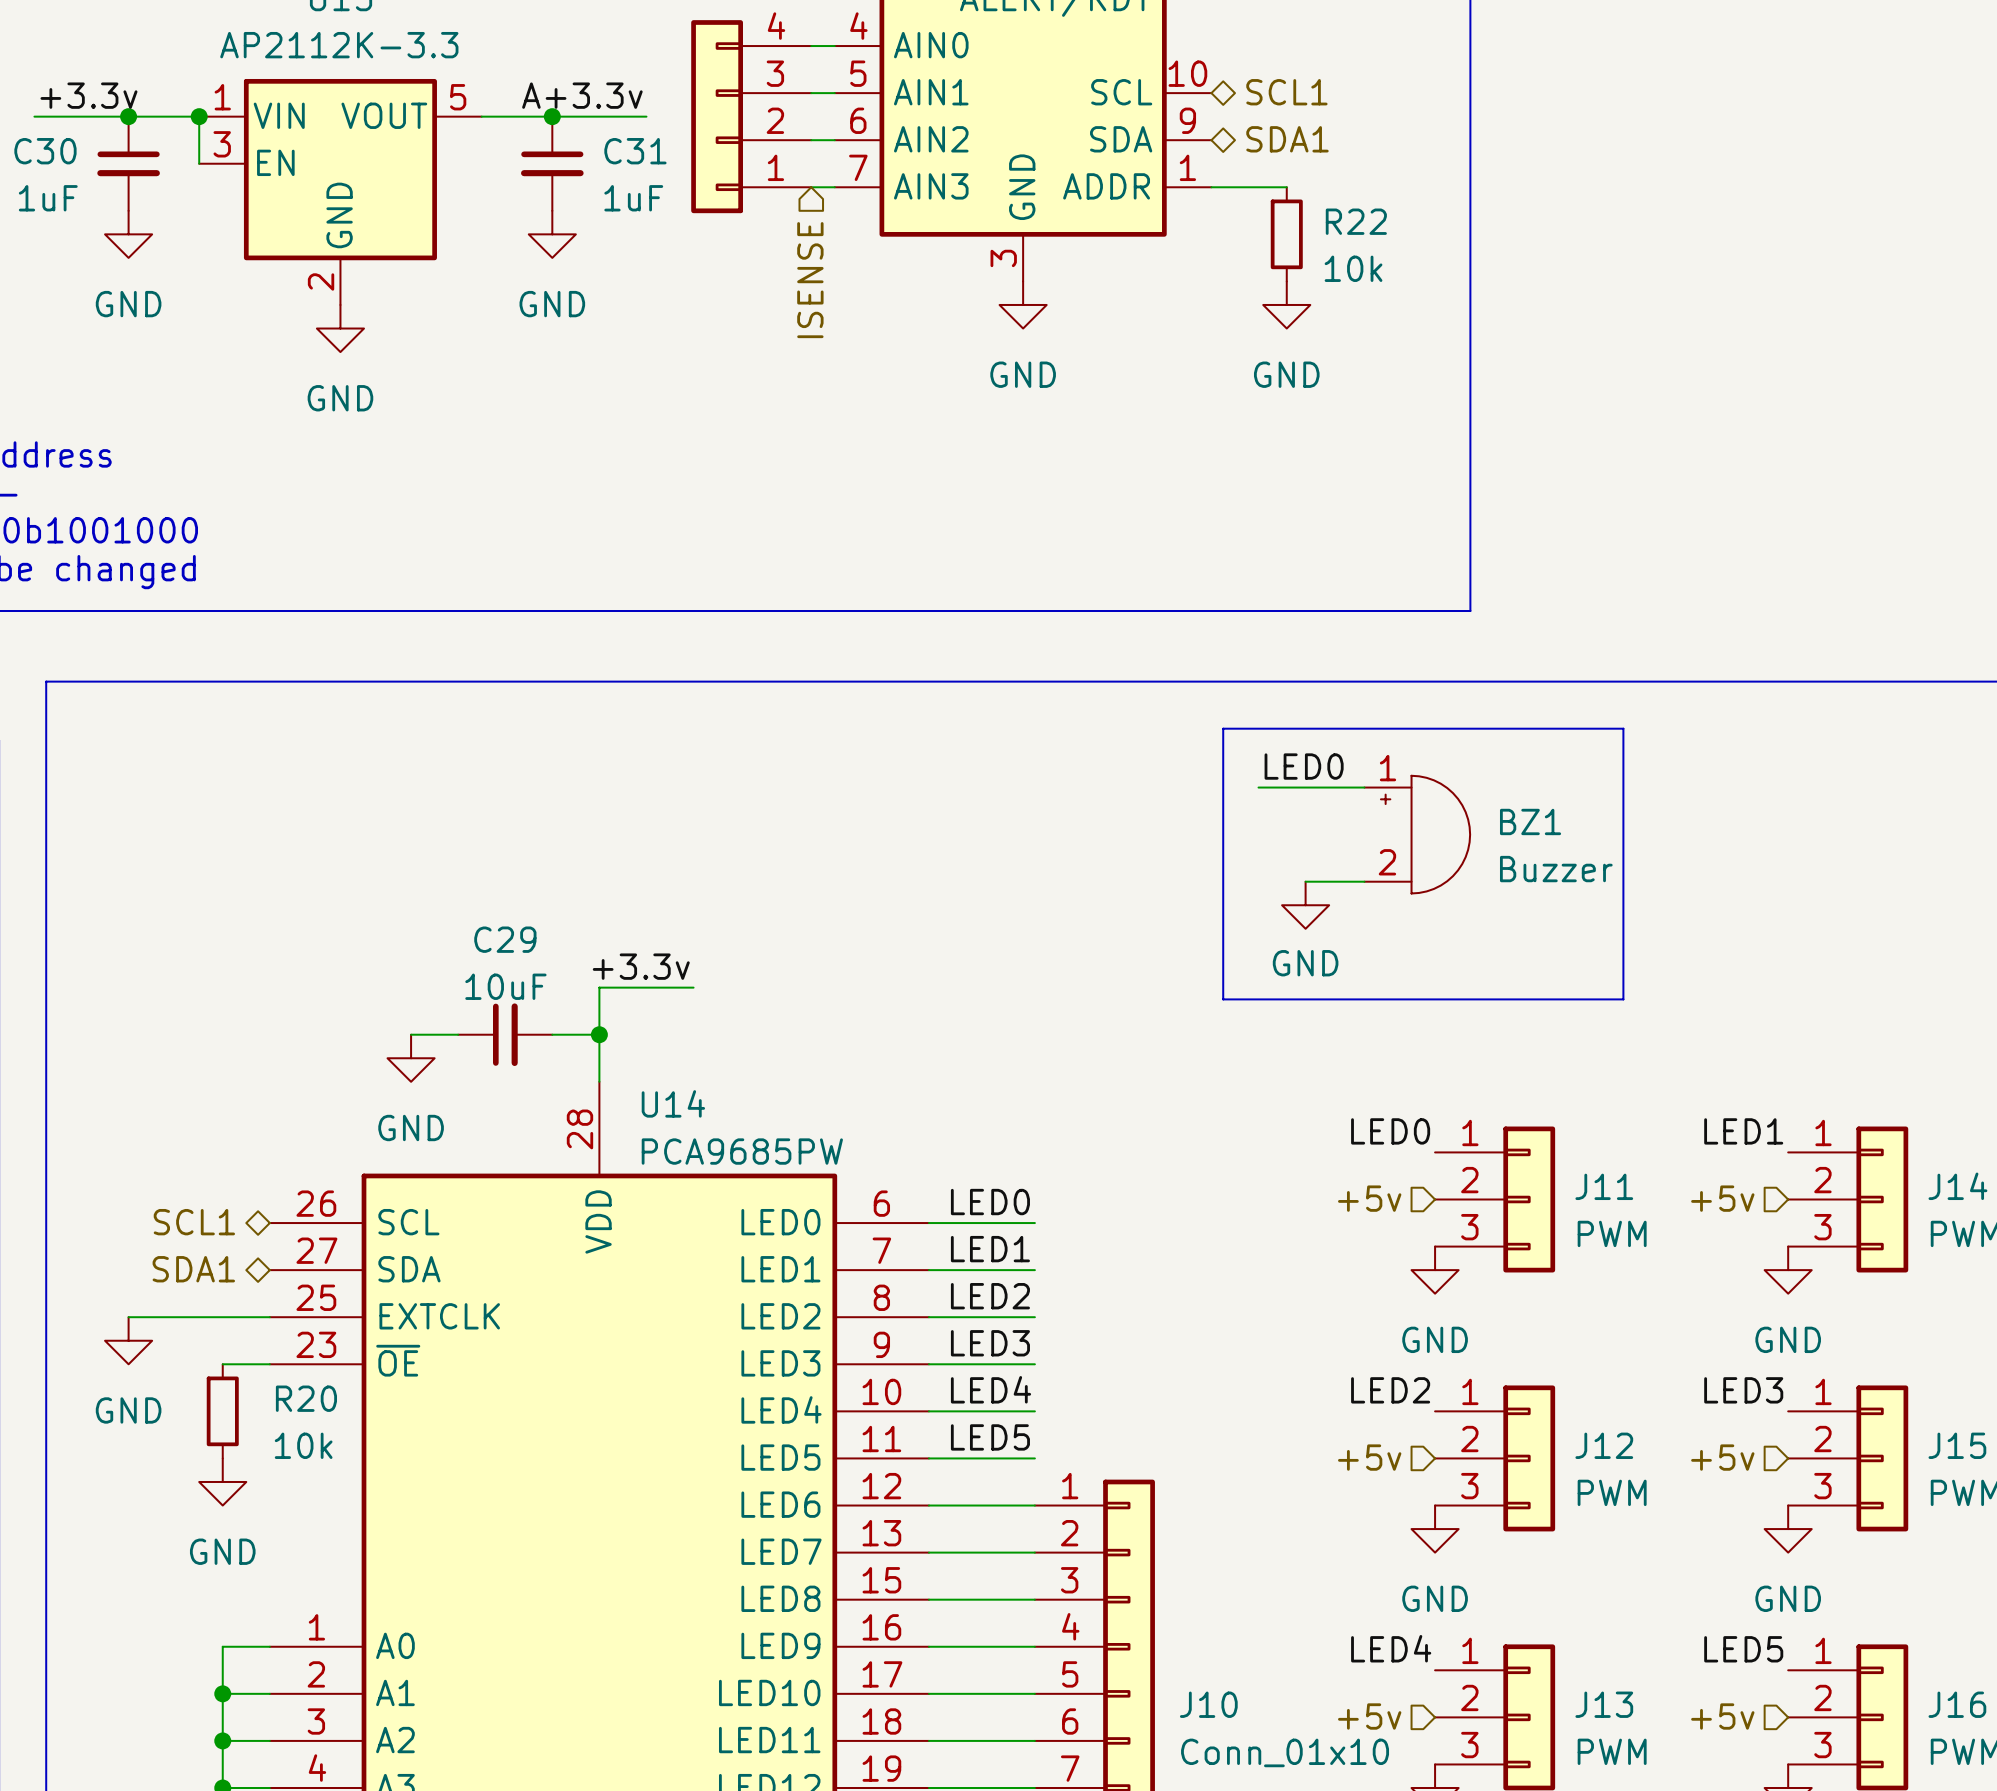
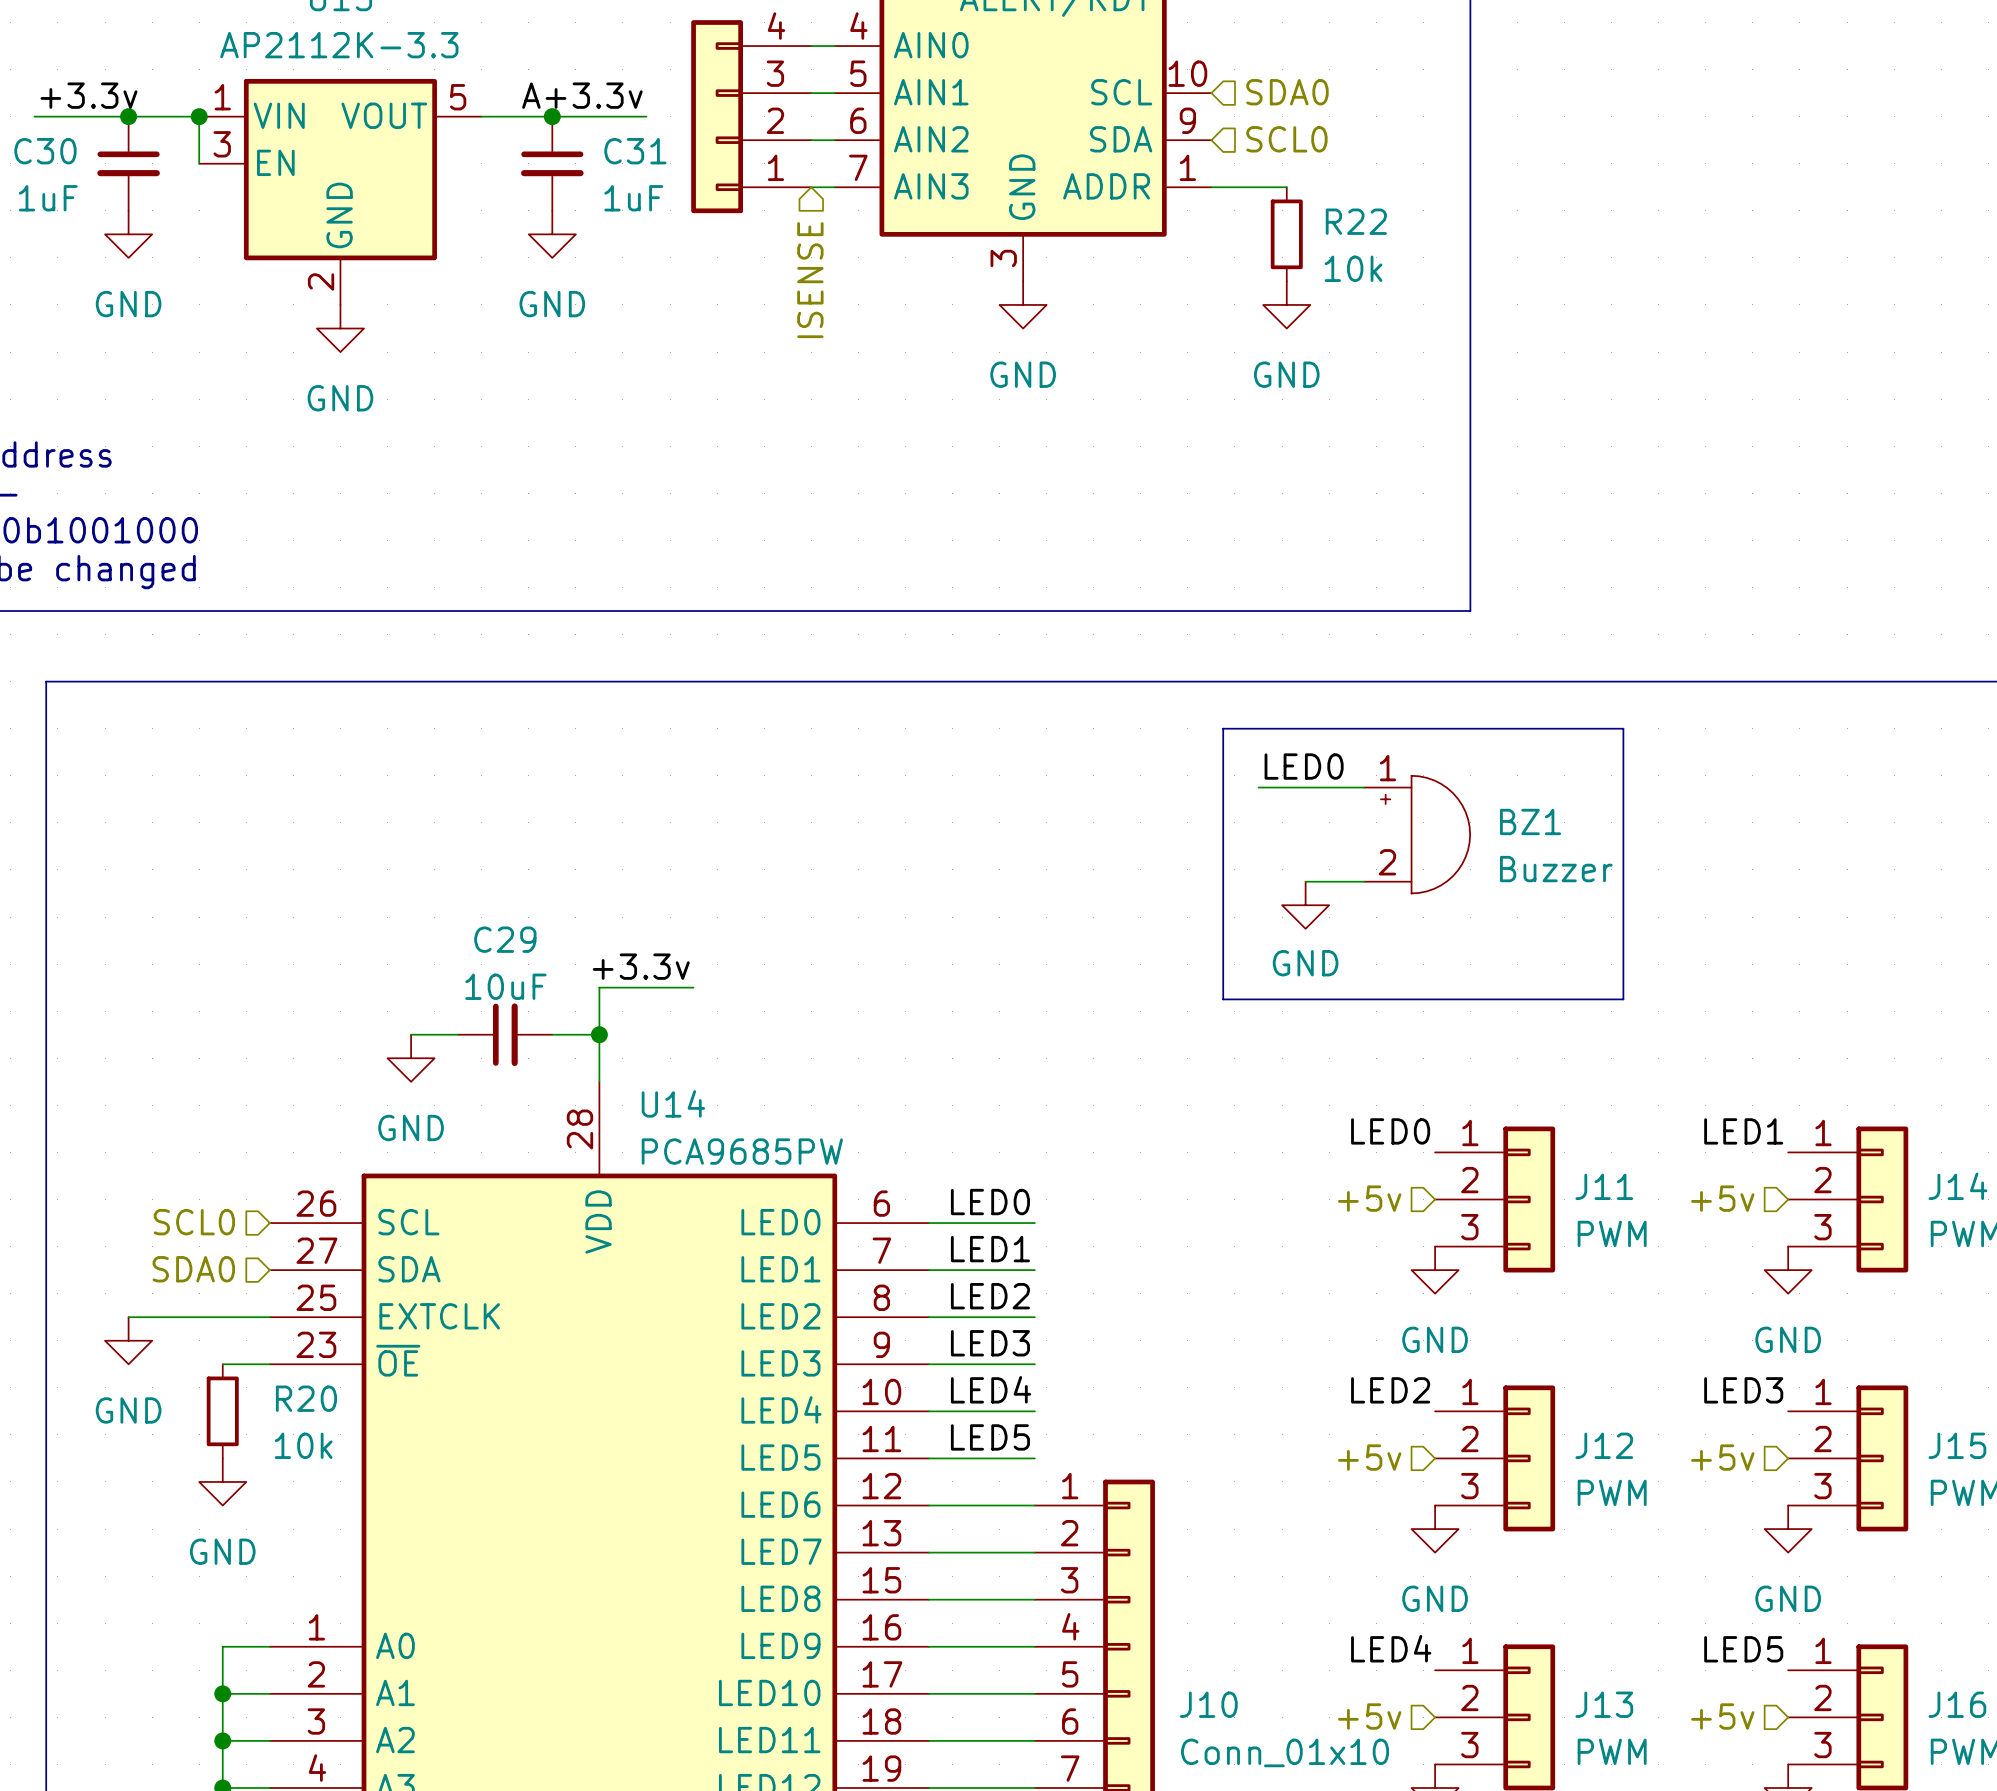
hierarchical label shape: bidirectional (1286, 92) -> input (1287, 92)
hierarchical label: SCL1 (1286, 92) -> SDA0 (1287, 92)
hierarchical label shape: bidirectional (1287, 139) -> input (1286, 139)
hierarchical label: SDA1 (1287, 139) -> SCL0 (1286, 139)
hierarchical label shape: bidirectional (194, 1222) -> input (194, 1222)
hierarchical label: SCL1 (194, 1222) -> SCL0 (194, 1222)
hierarchical label shape: bidirectional (193, 1269) -> input (193, 1269)
hierarchical label: SDA1 (193, 1269) -> SDA0 (193, 1269)

